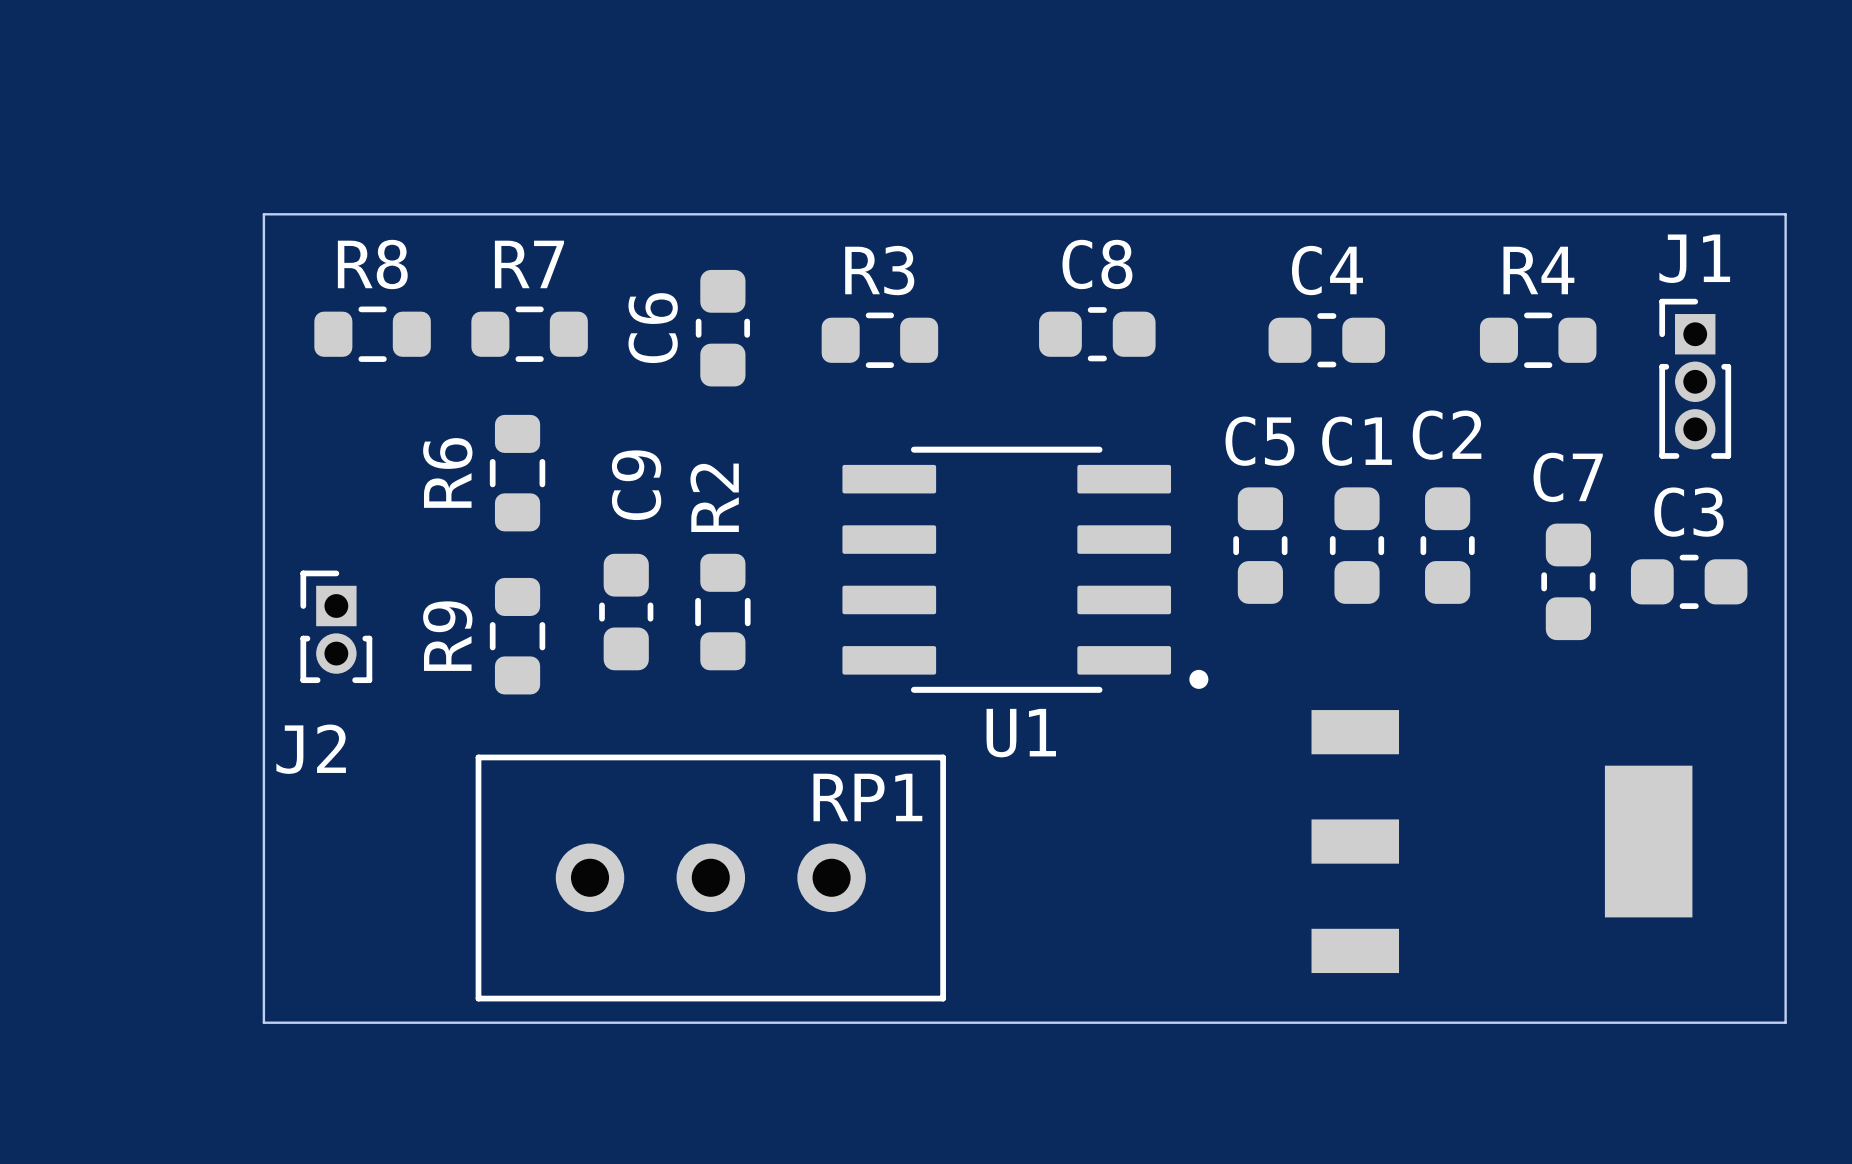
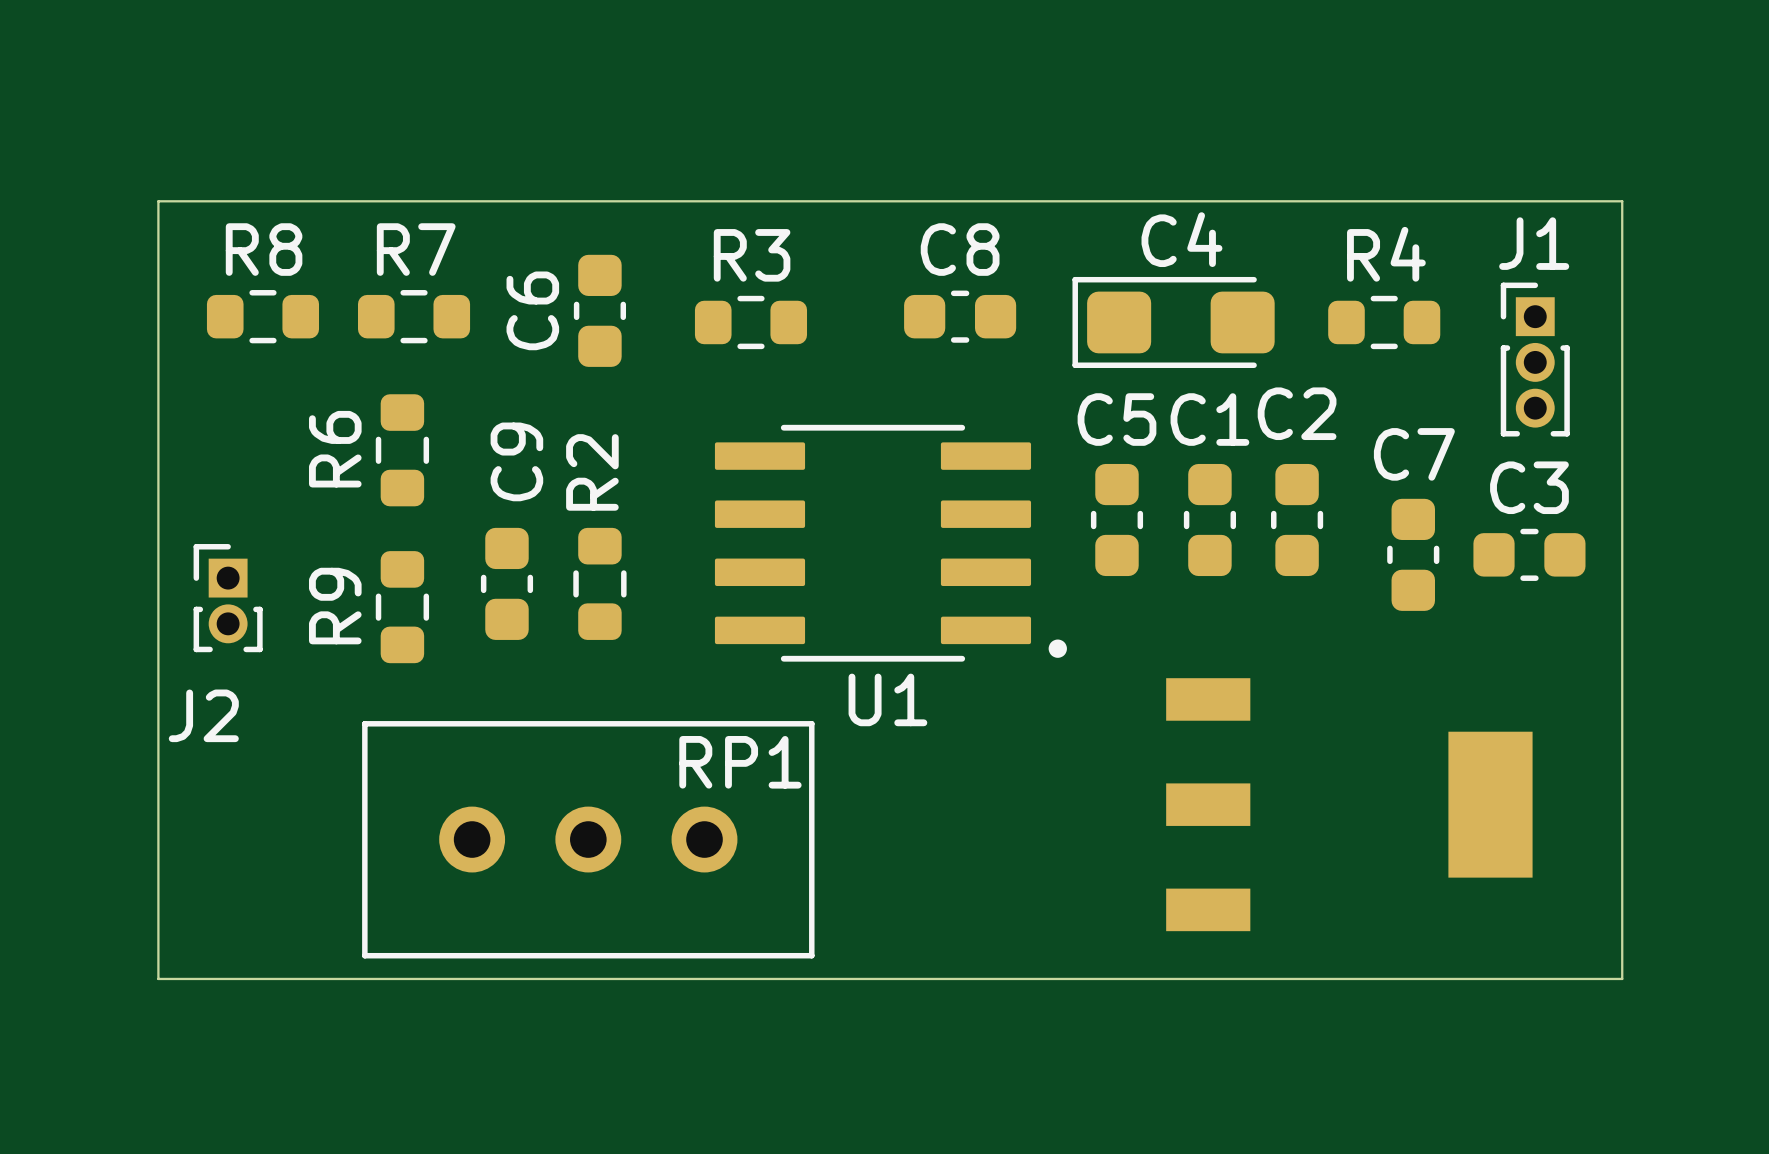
C4 footprint: [1268, 313, 1386, 368] -> [1072, 276, 1275, 368]

